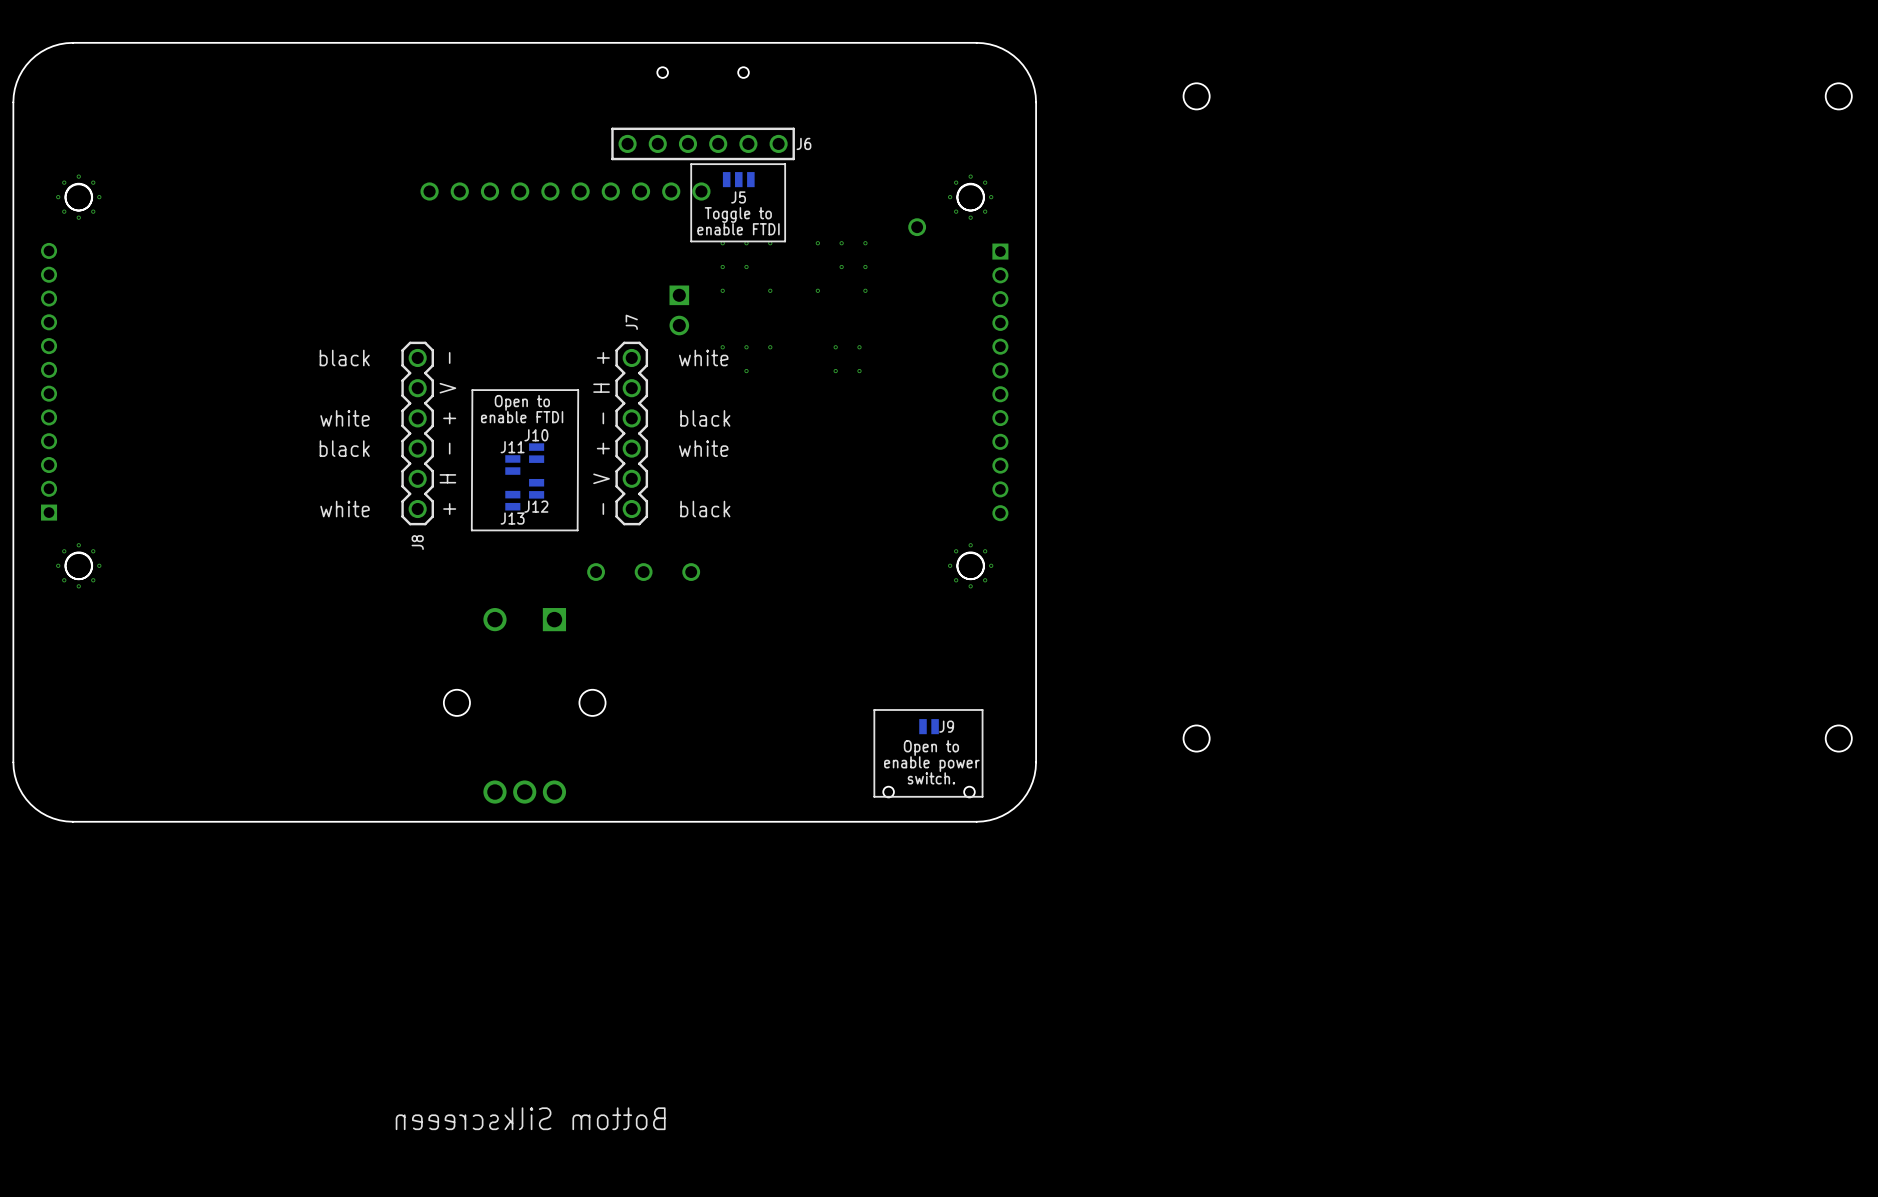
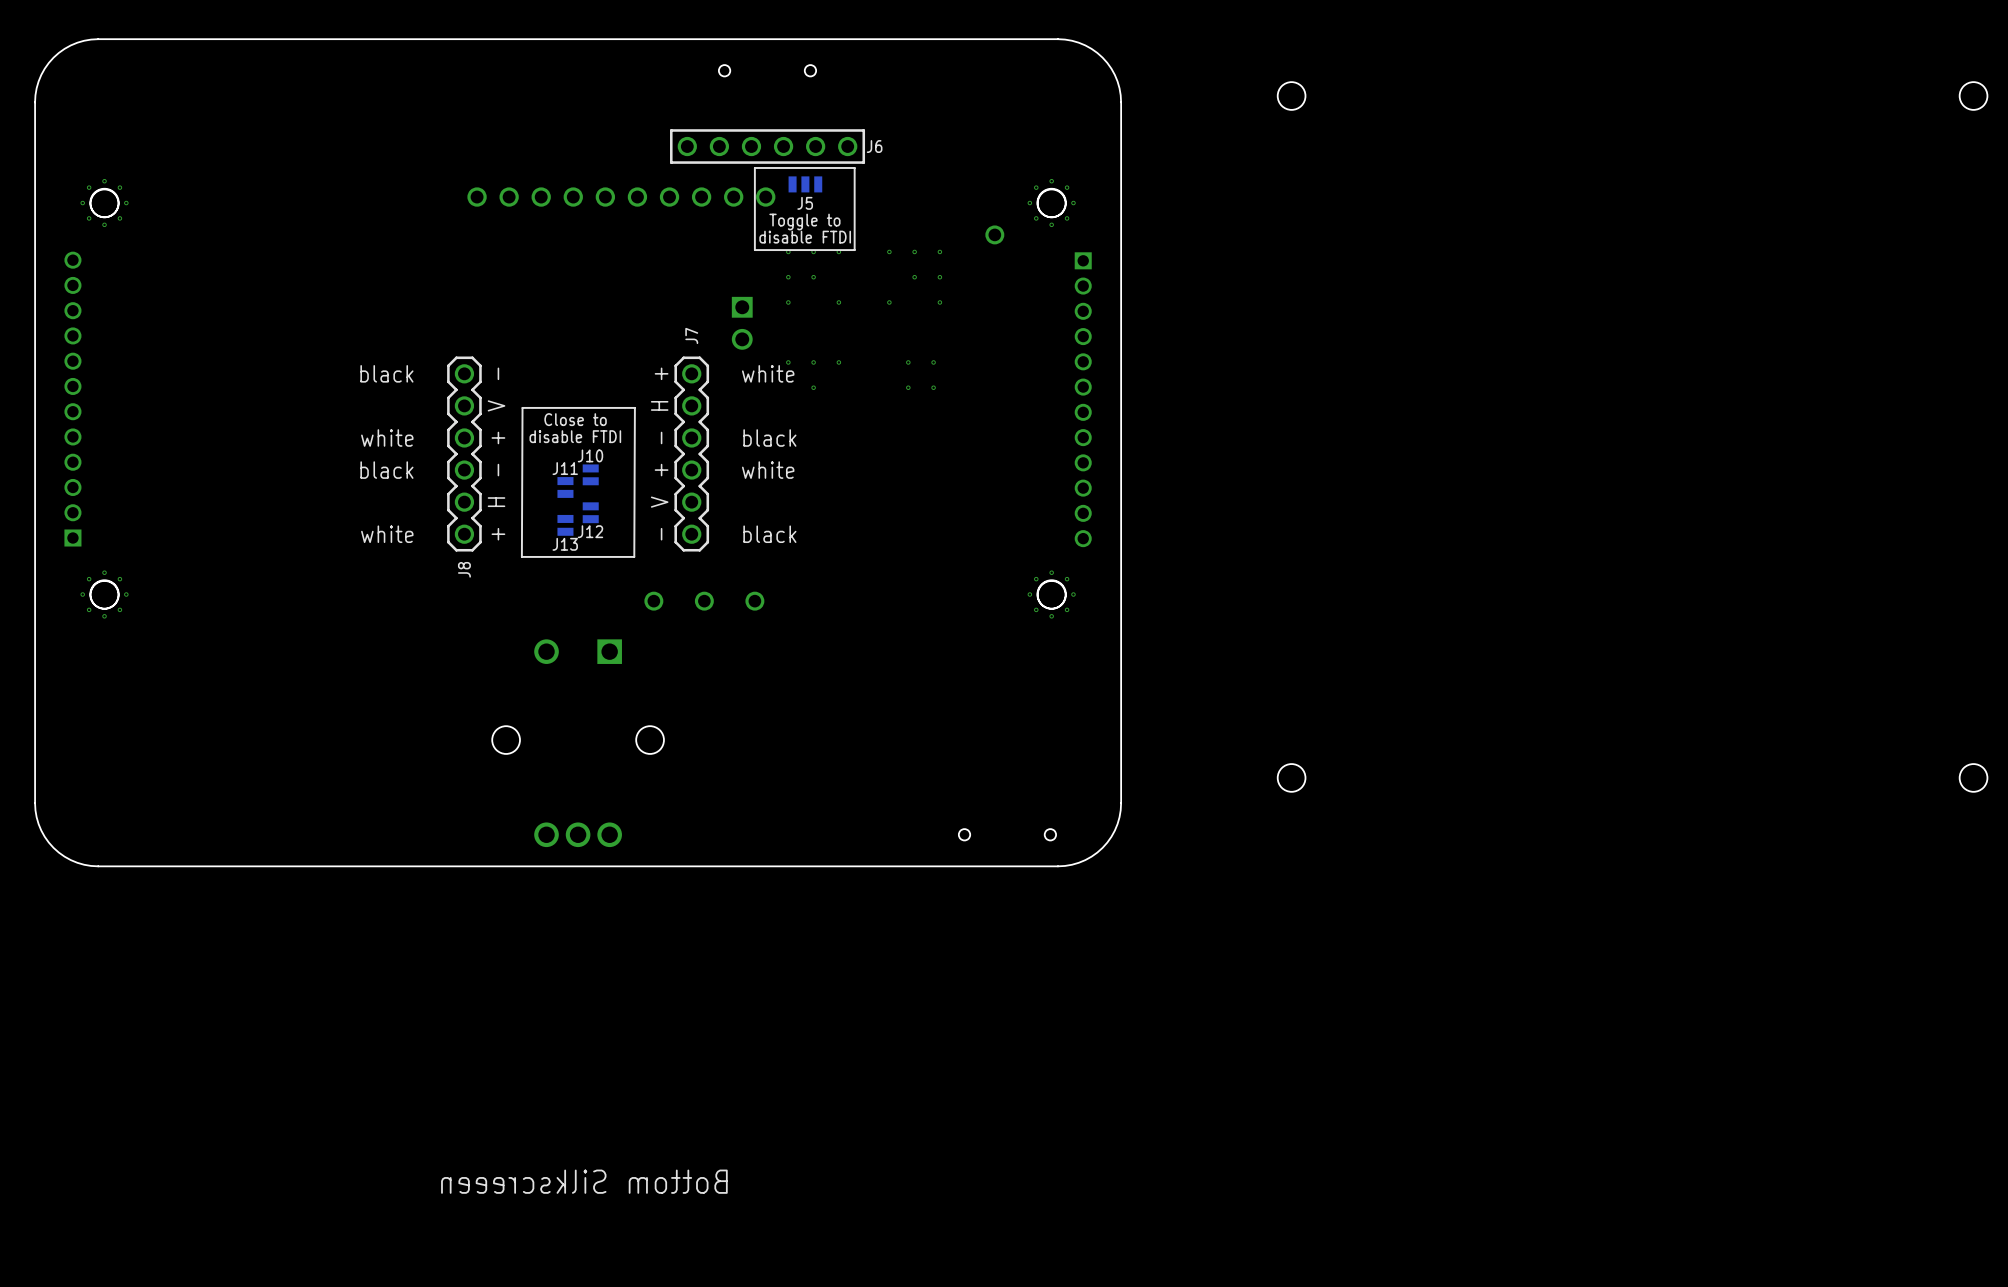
text: enable FTDI (738, 229) -> disable FTDI (805, 237)
text: Open to (522, 402) -> Close to (575, 419)
text: enable FTDI (522, 417) -> disable FTDI (575, 436)
line: (982, 709) (982, 796) (874, 796) (874, 709) (982, 709) -> none
J9: (929, 726) -> none
text: Open to (931, 748) -> none
text: enable power (931, 764) -> none
text: switch. (931, 778) -> none

